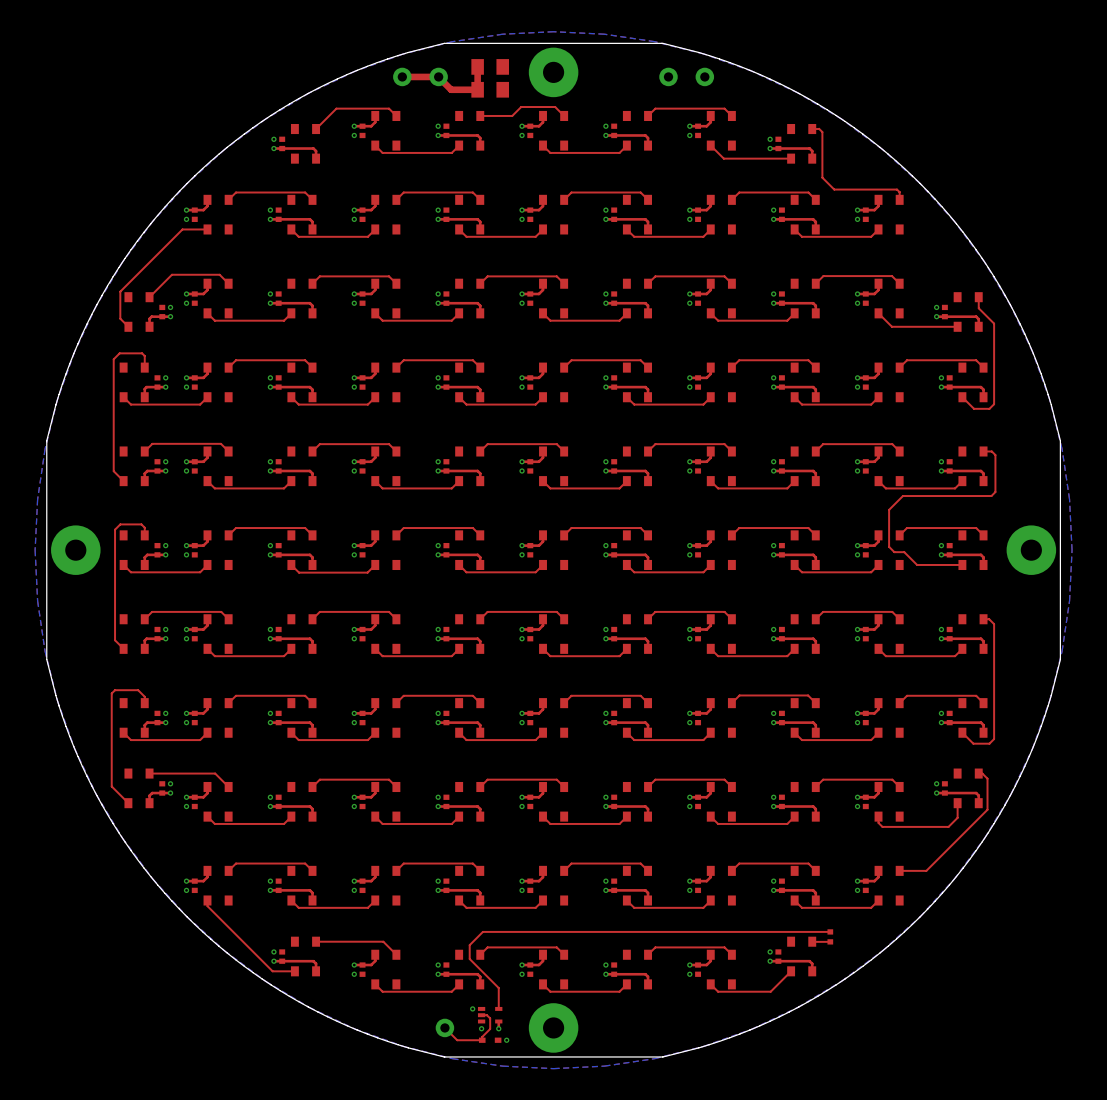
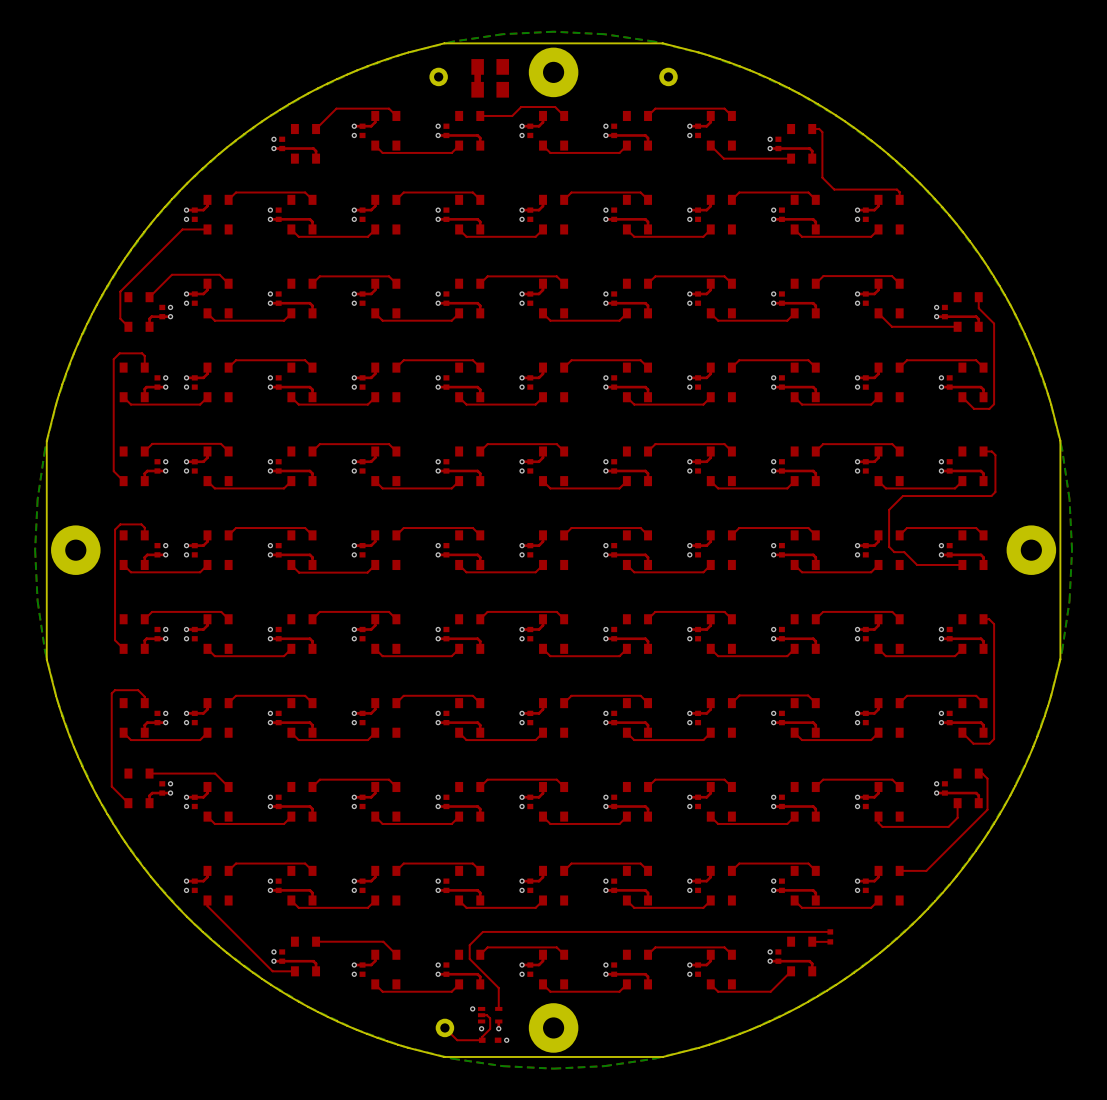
top track: (402, 76) (438, 76) (451, 89) (477, 89) -> none
part: (402, 76) -> none
part: (704, 76) -> none

